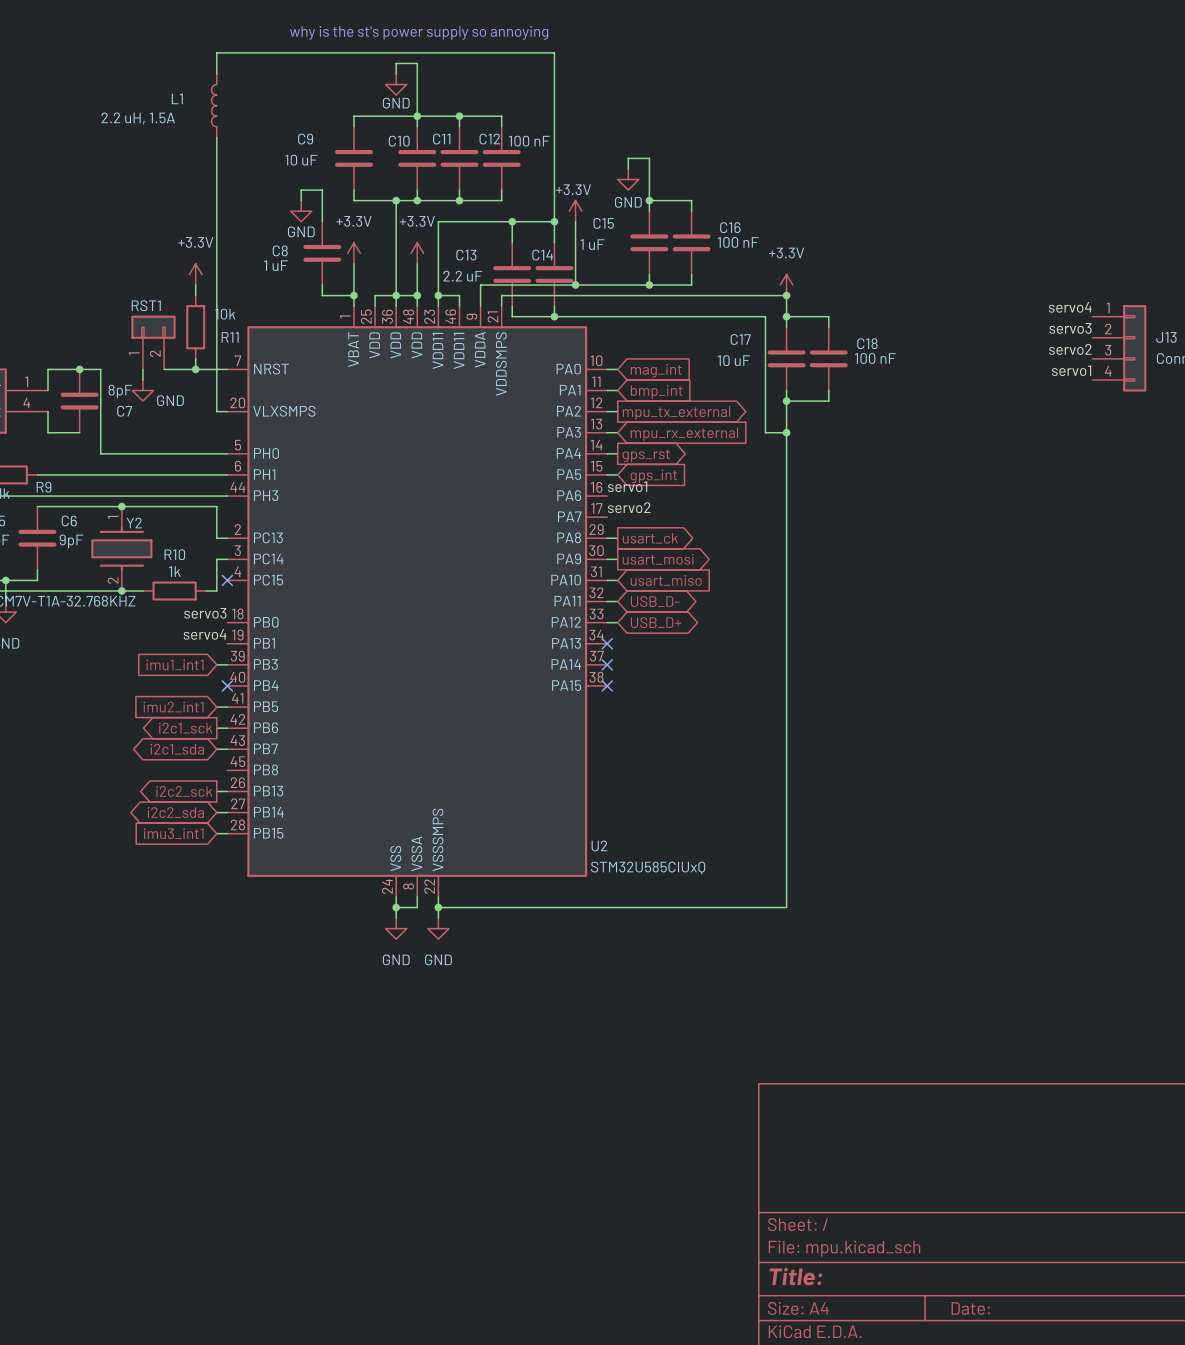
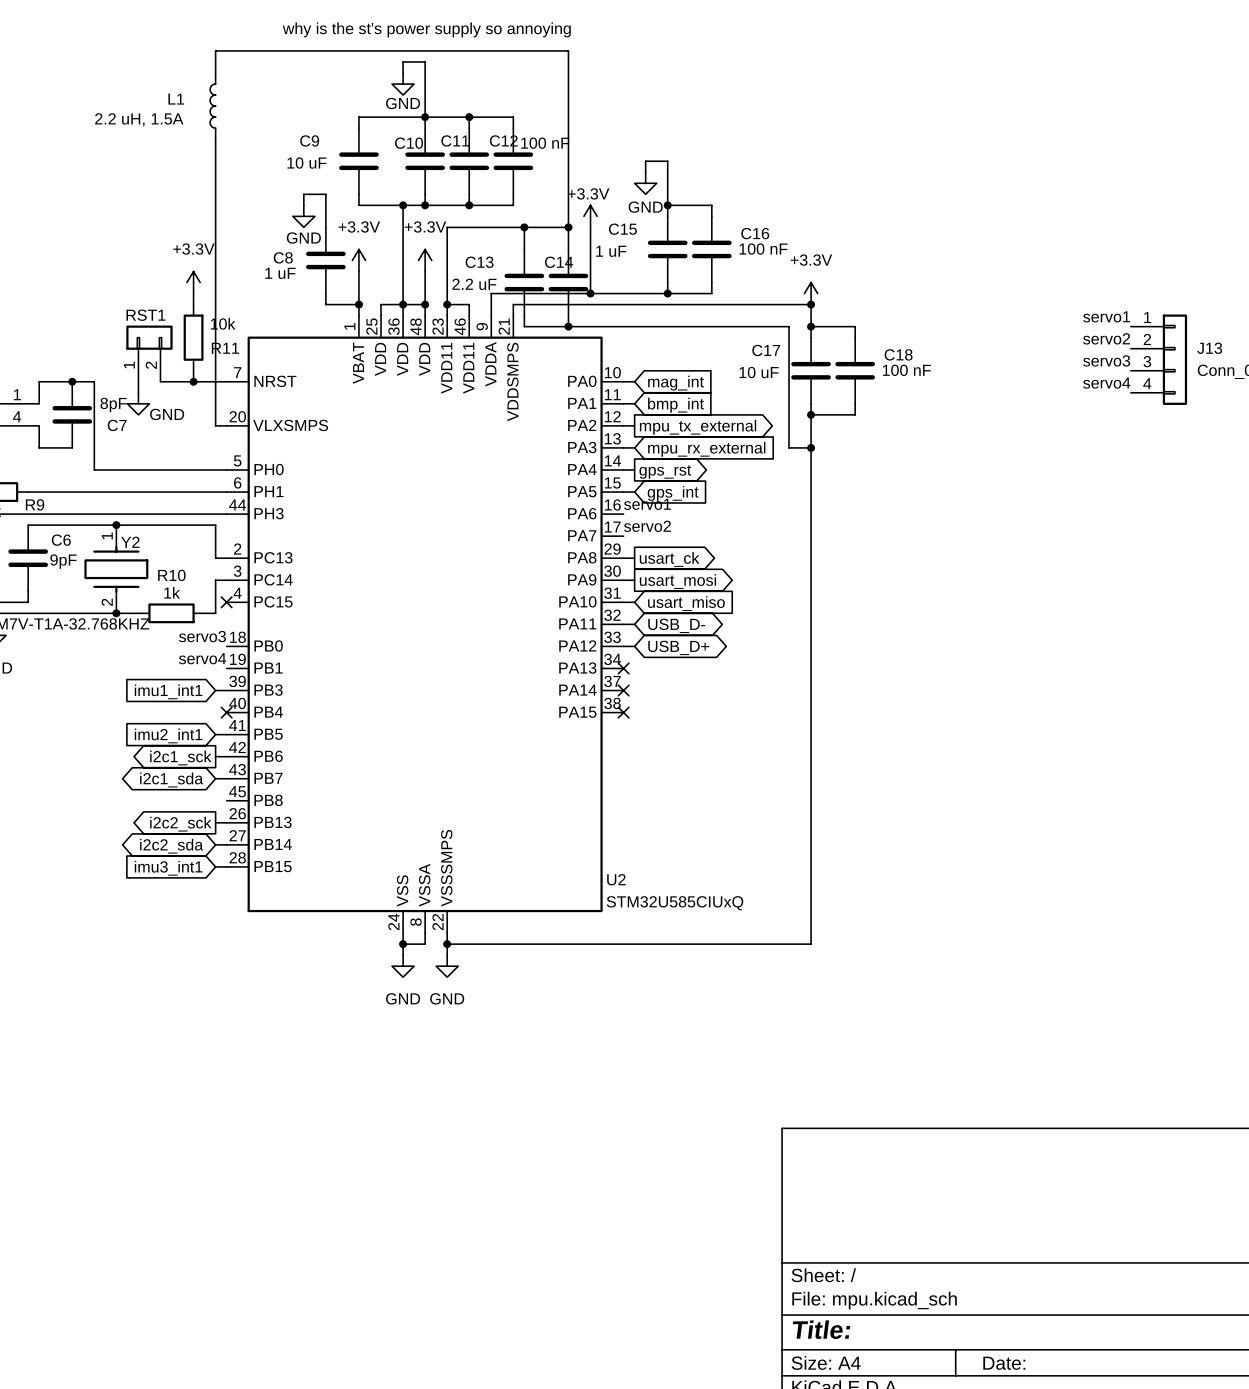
label: servo4 (1070, 307) -> servo1 (1106, 316)
label: servo3 (1070, 328) -> servo2 (1106, 338)
label: servo2 (1070, 349) -> servo3 (1106, 360)
label: servo1 (1071, 370) -> servo4 (1106, 383)

